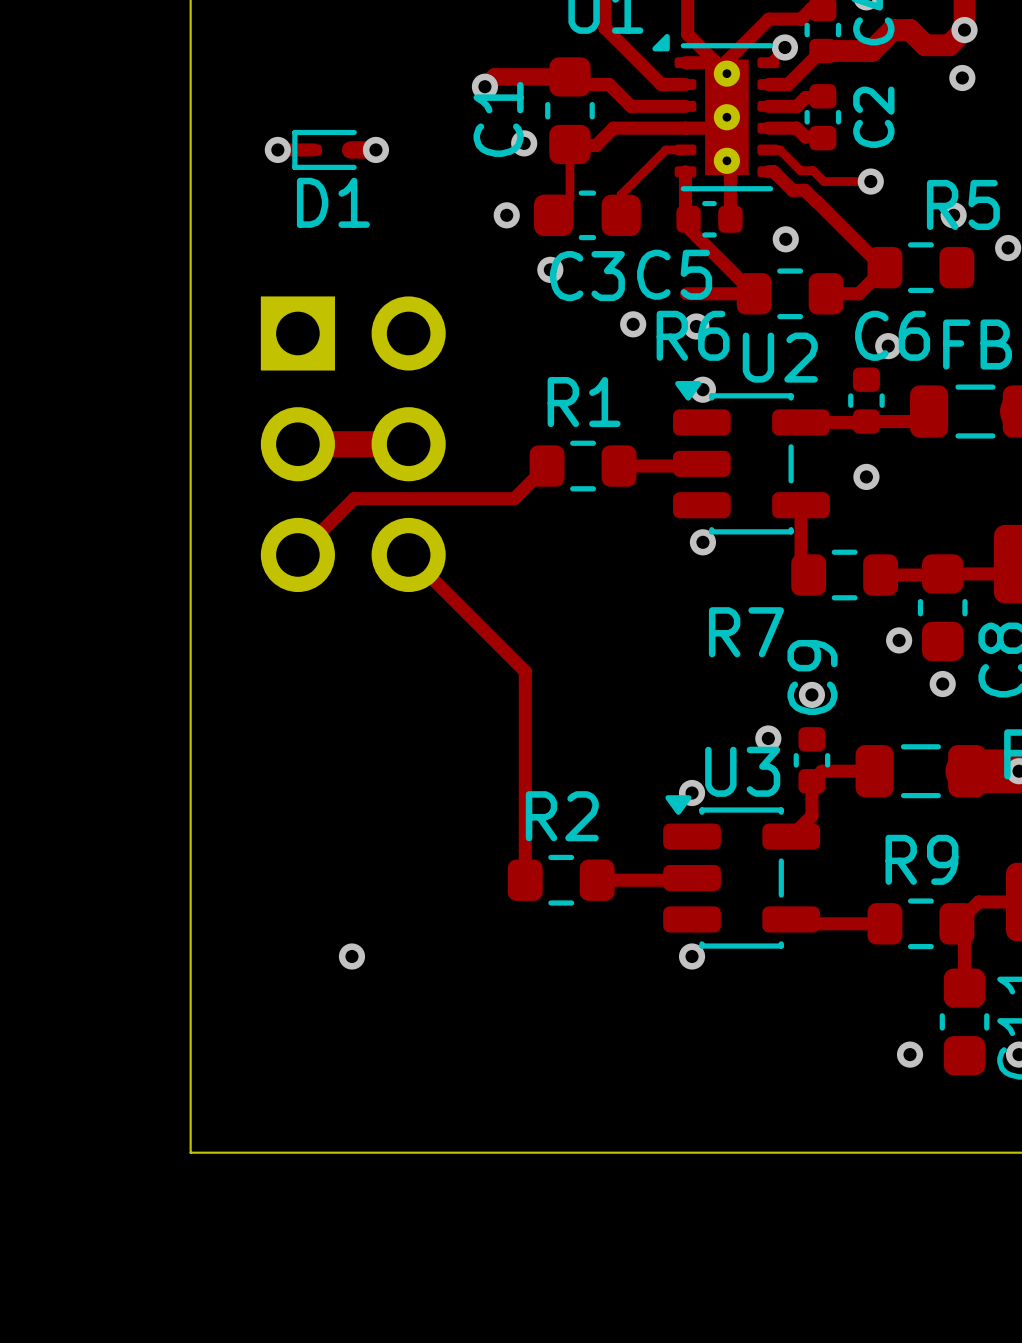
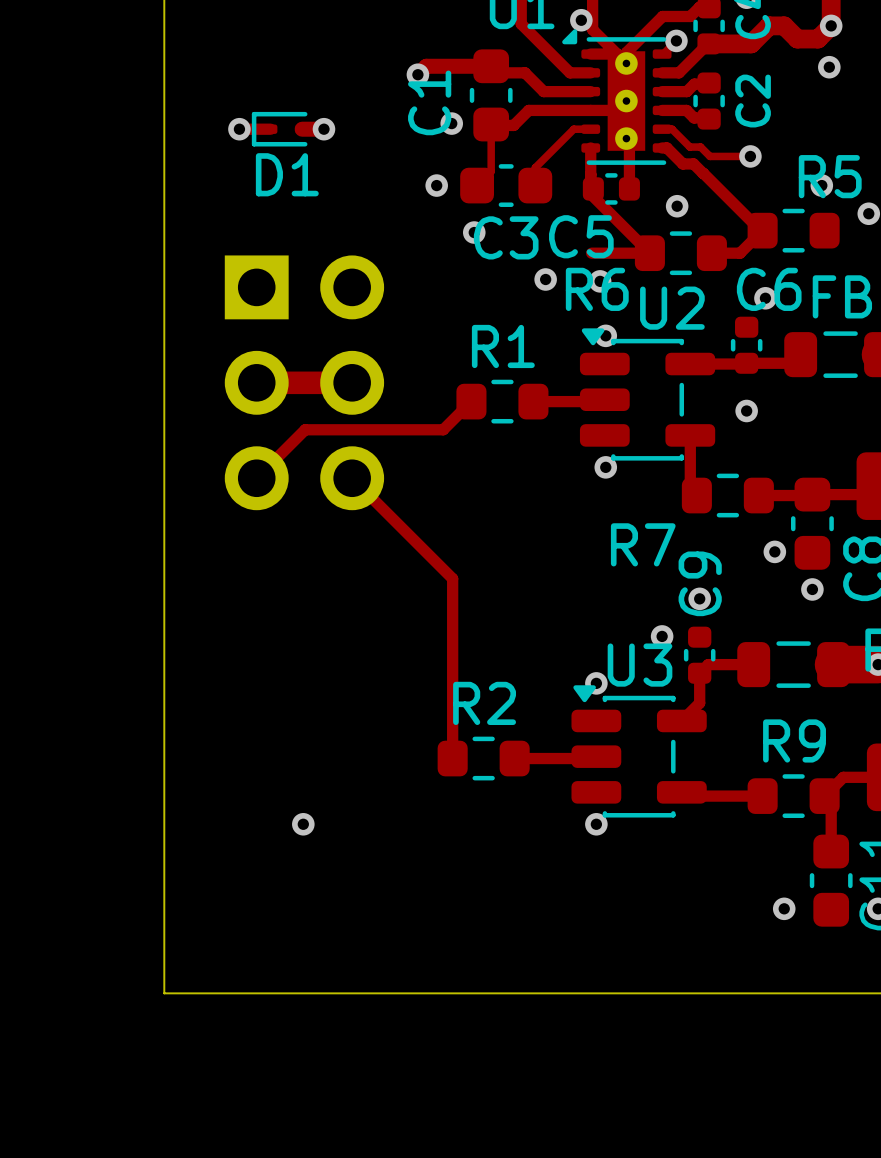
via: none -> (581, 20)

